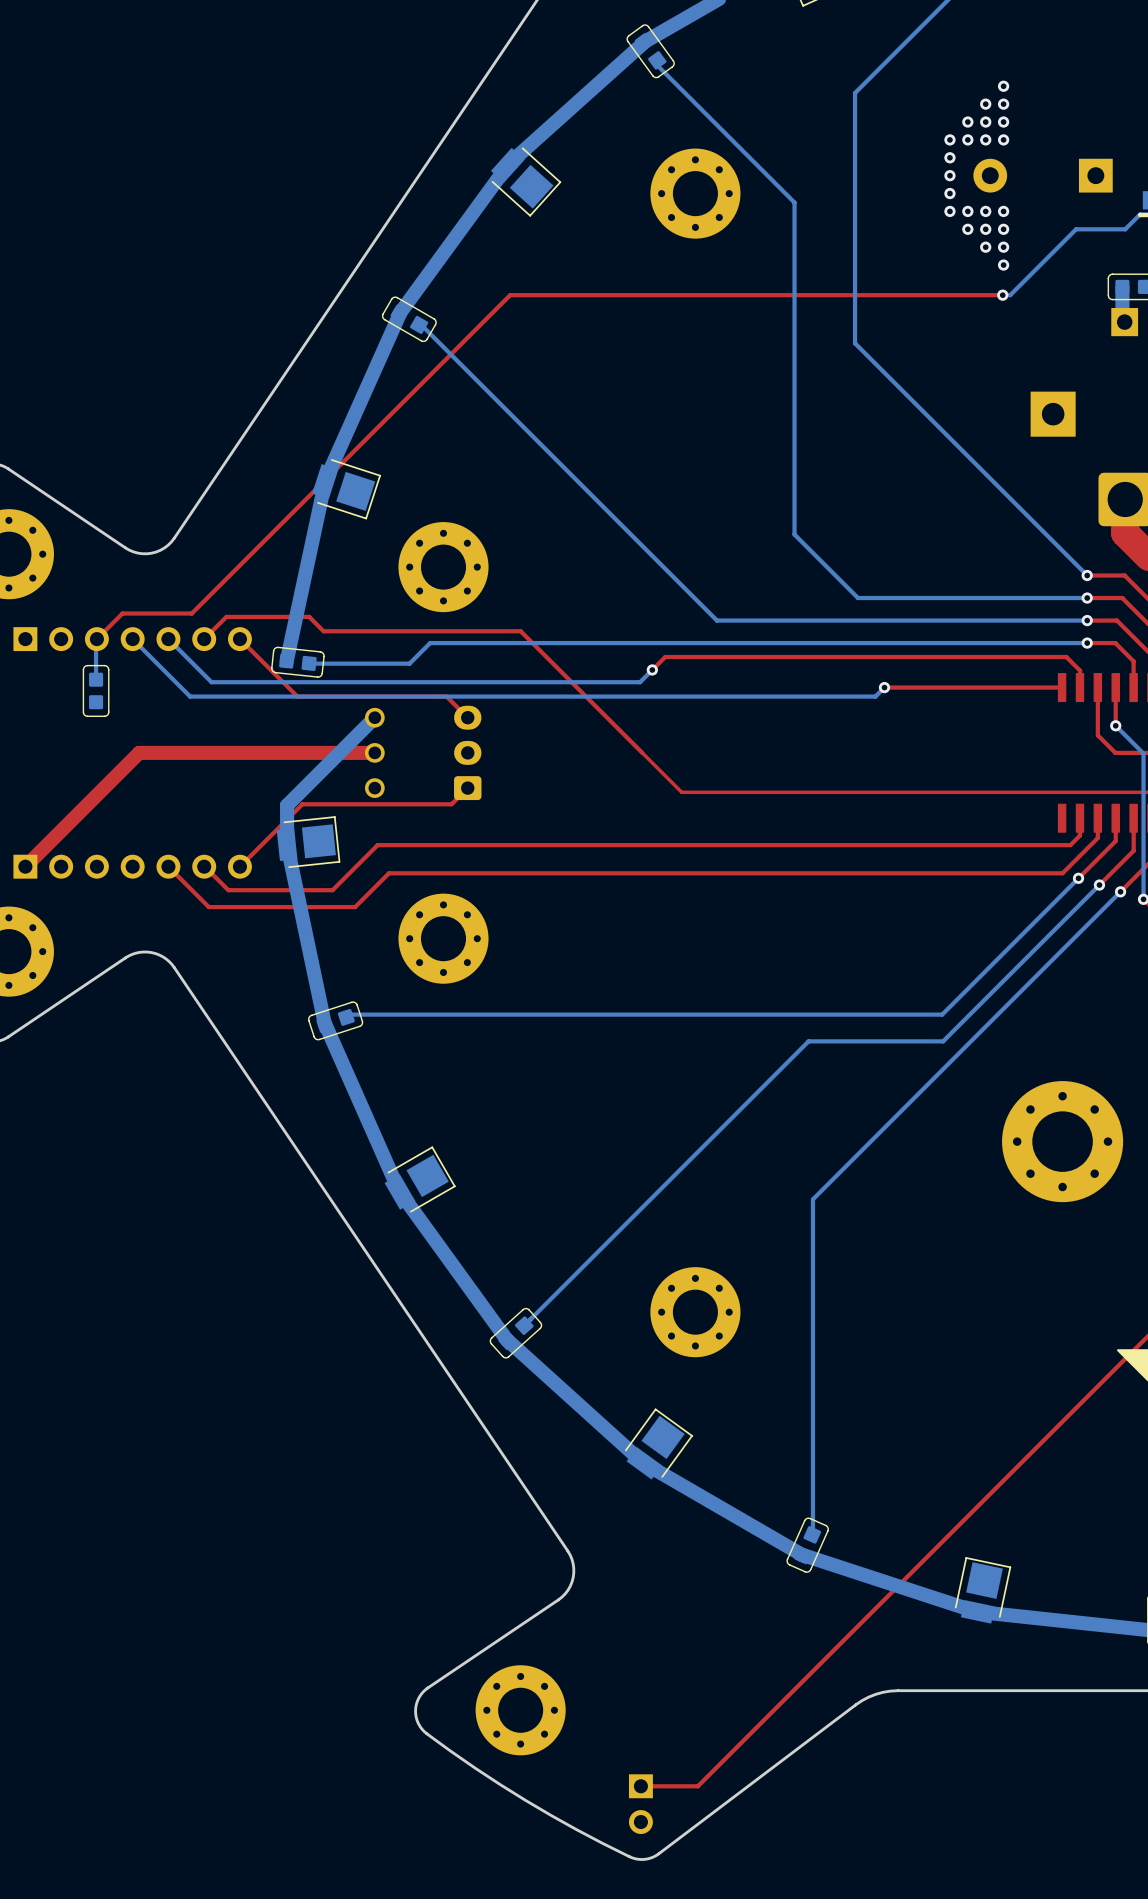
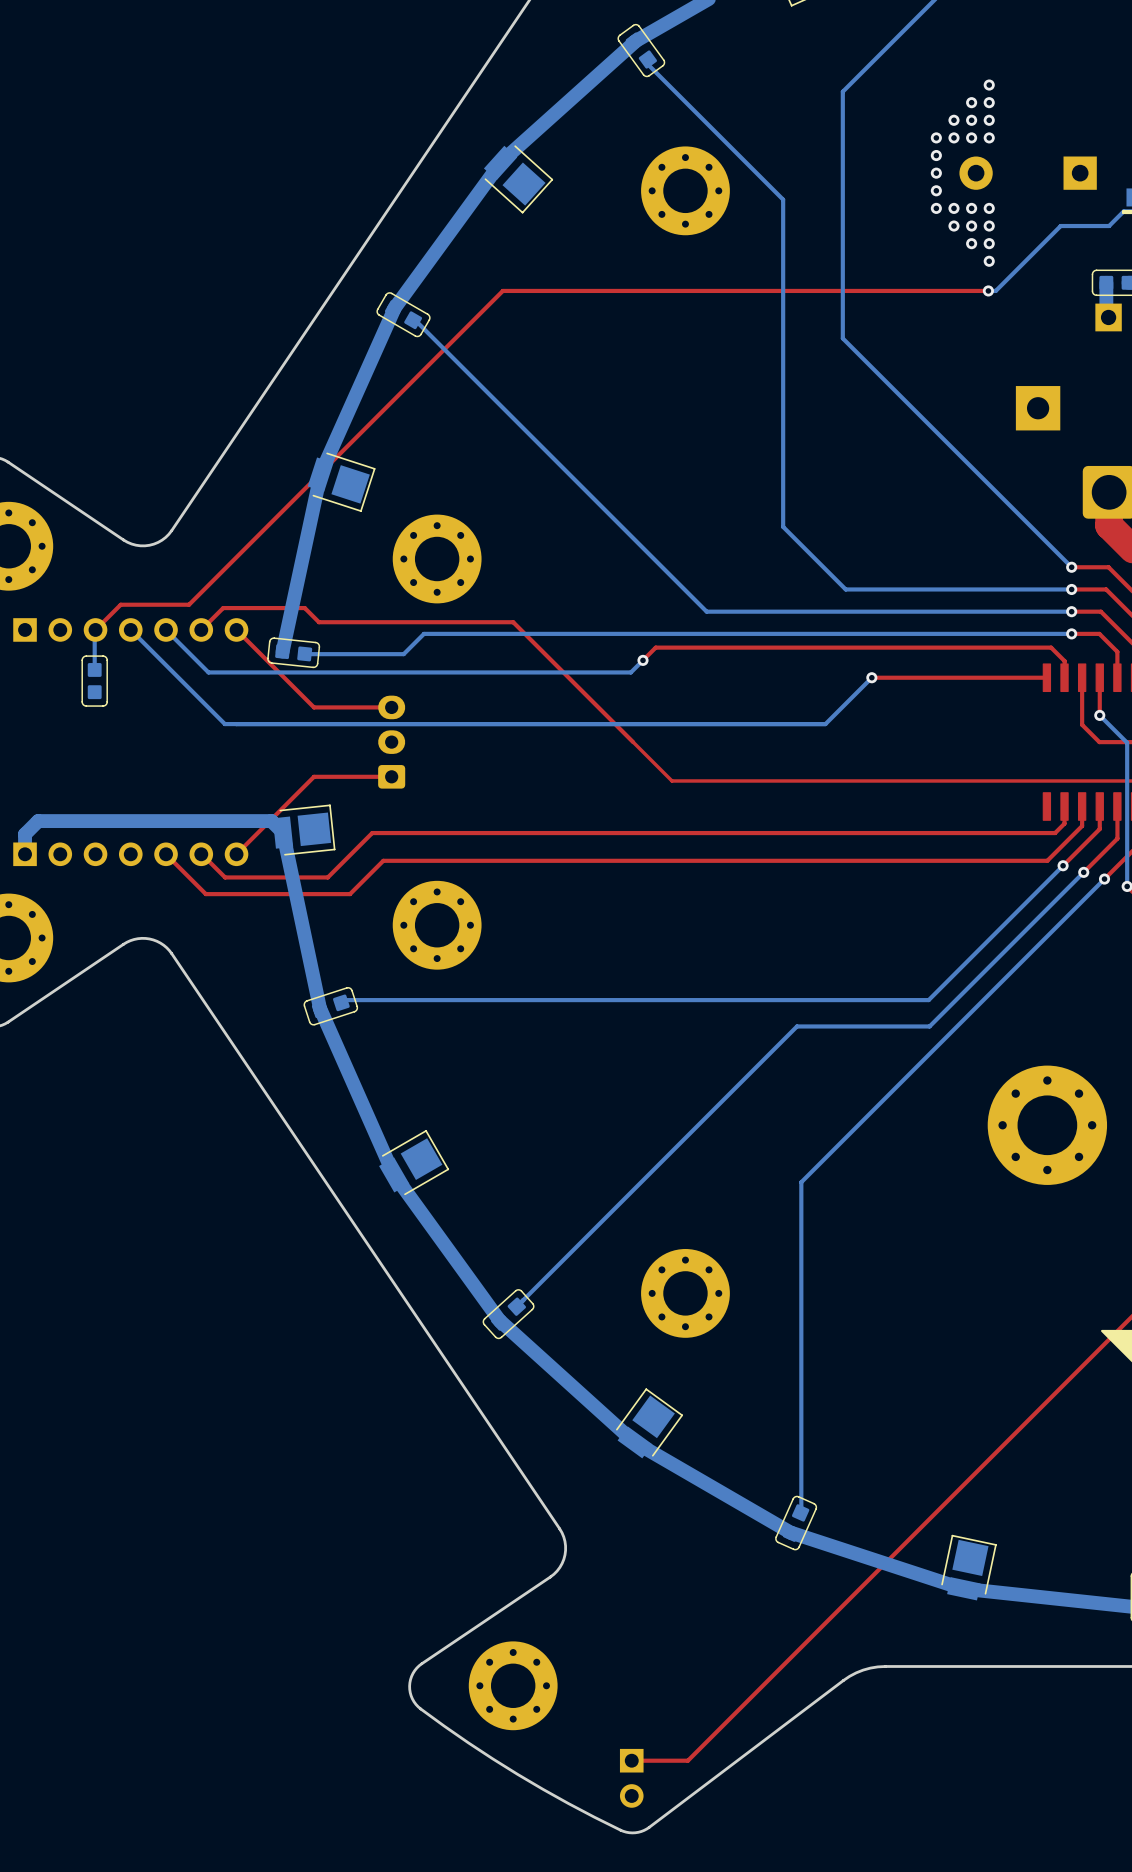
top track: (297, 696) (446, 696) (467, 717) -> (293, 686) (314, 707) (391, 707)
bottom track: (875, 696) (190, 696) -> (862, 686) (825, 724) (224, 724) (187, 686)
bottom track: (374, 717) (287, 805) (287, 844) -> (25, 854) (25, 834) (38, 821) (271, 821) (282, 832)
top track: (374, 752) (139, 752) (25, 866) -> none
part: (374, 752) -> none
part position: (467, 752) -> (391, 742)
top track: (467, 788) (451, 804) (302, 804) -> (391, 776) (314, 776) (298, 792)

